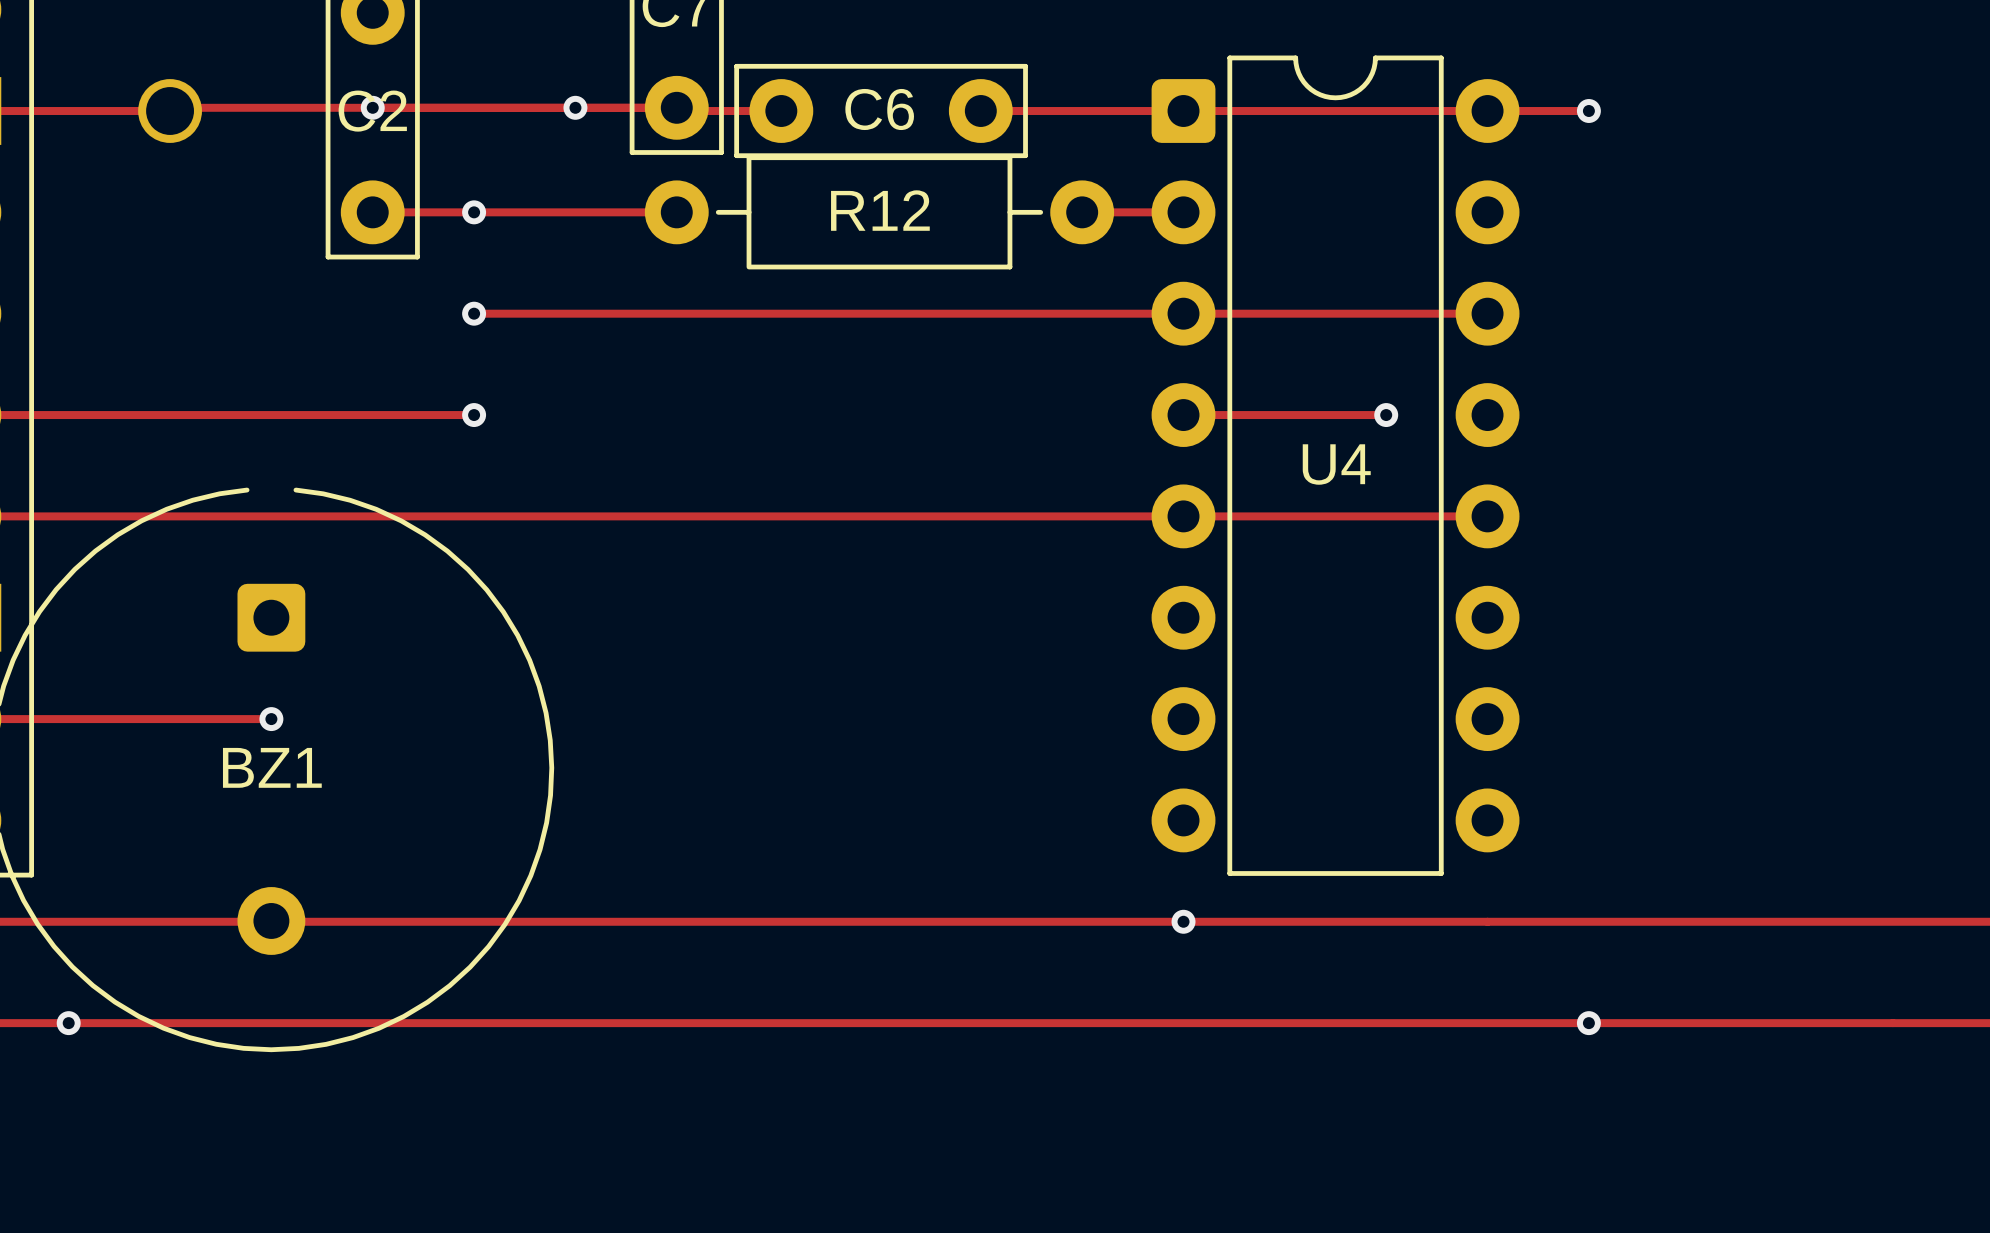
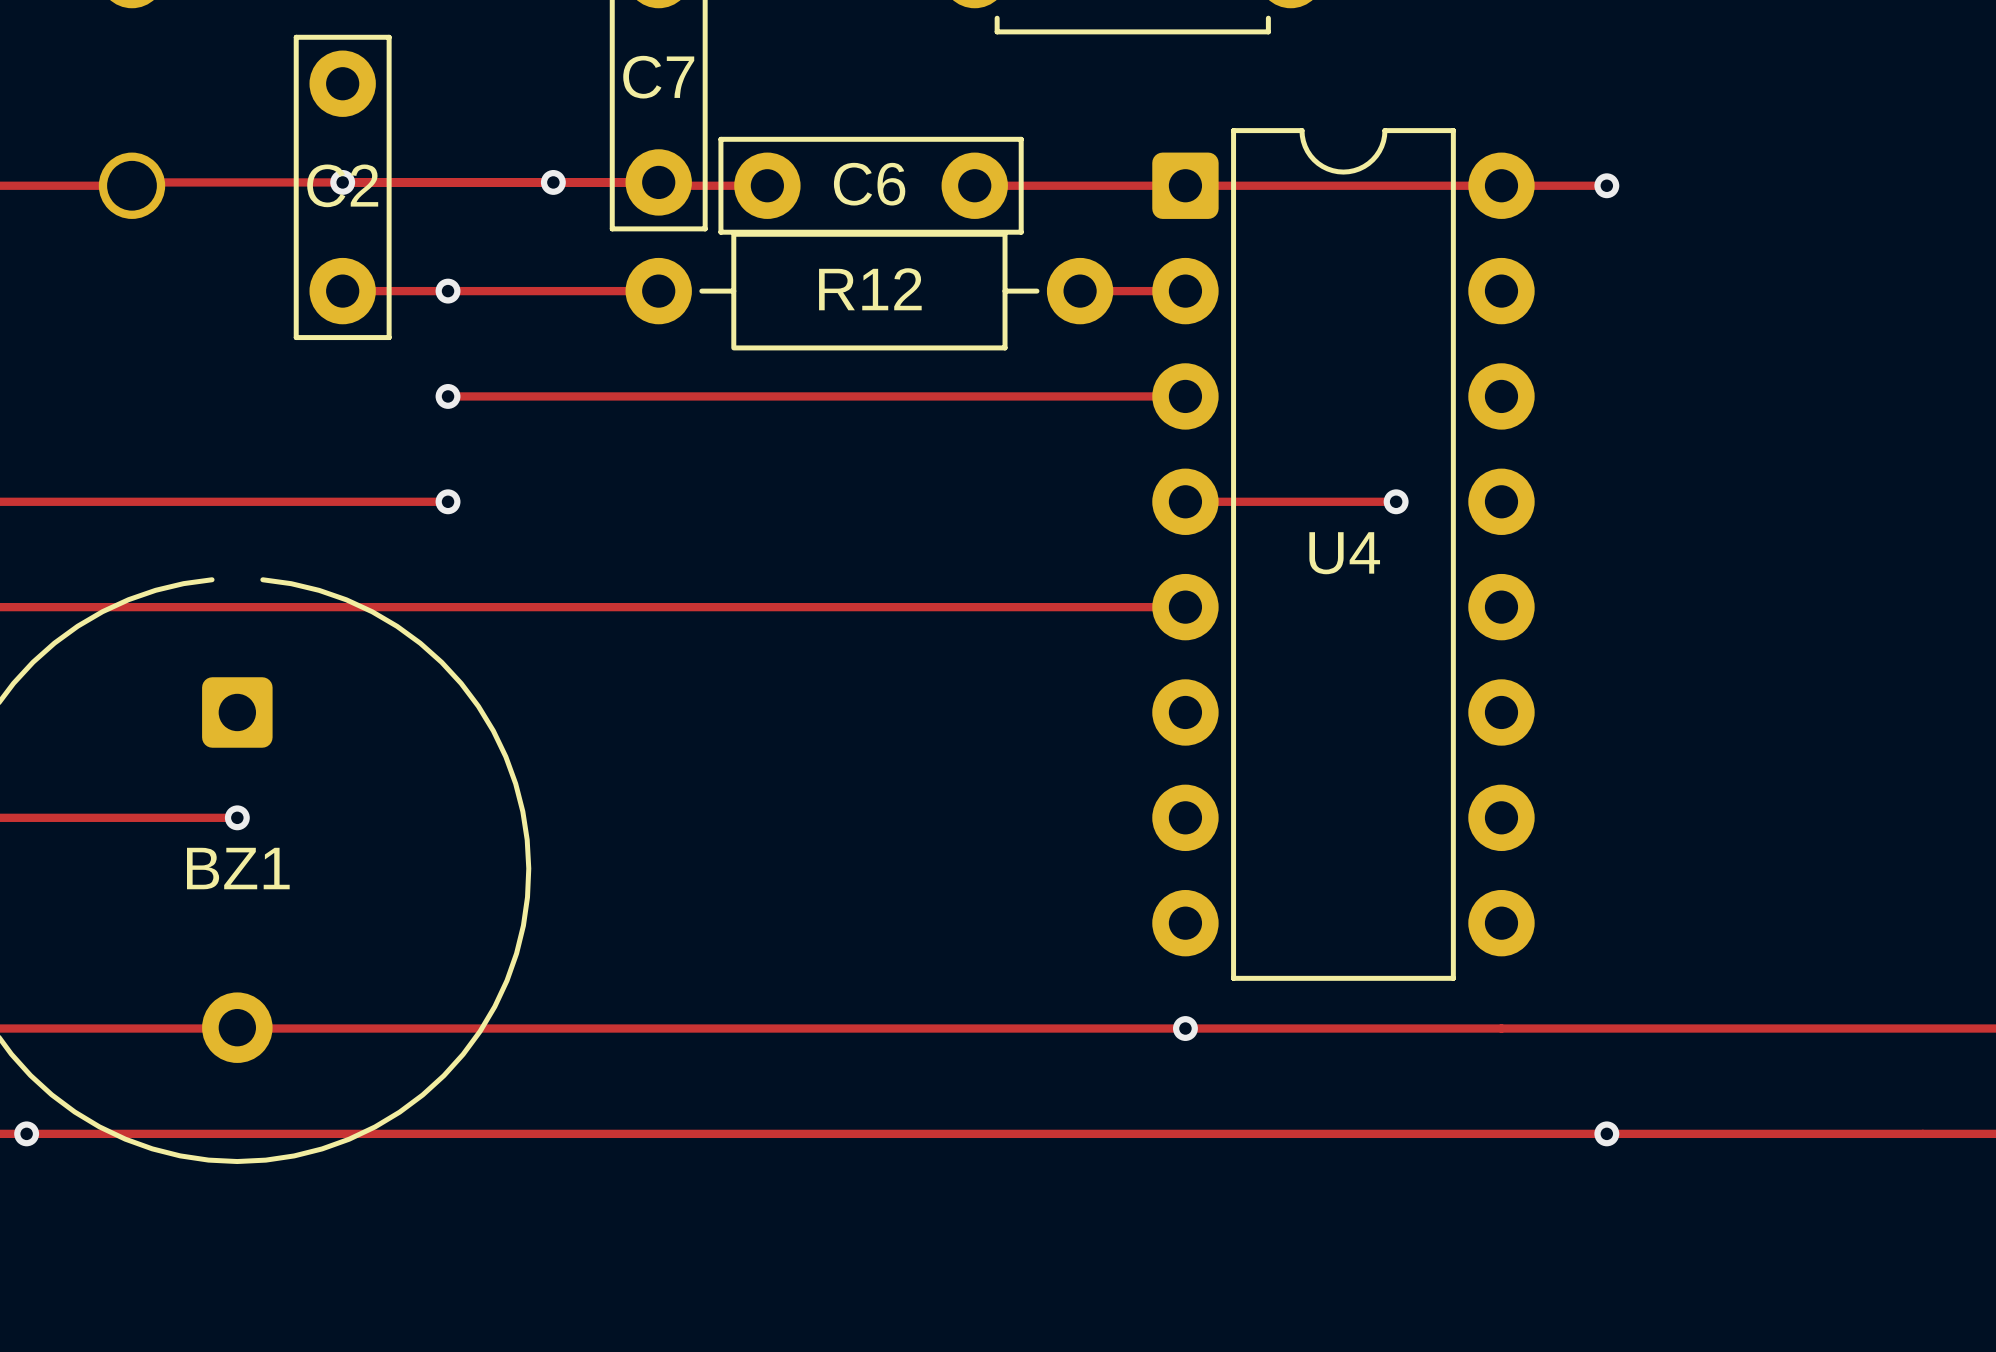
track: (1183, 313) (1487, 313) -> none
track: (1183, 516) (1487, 516) -> none

